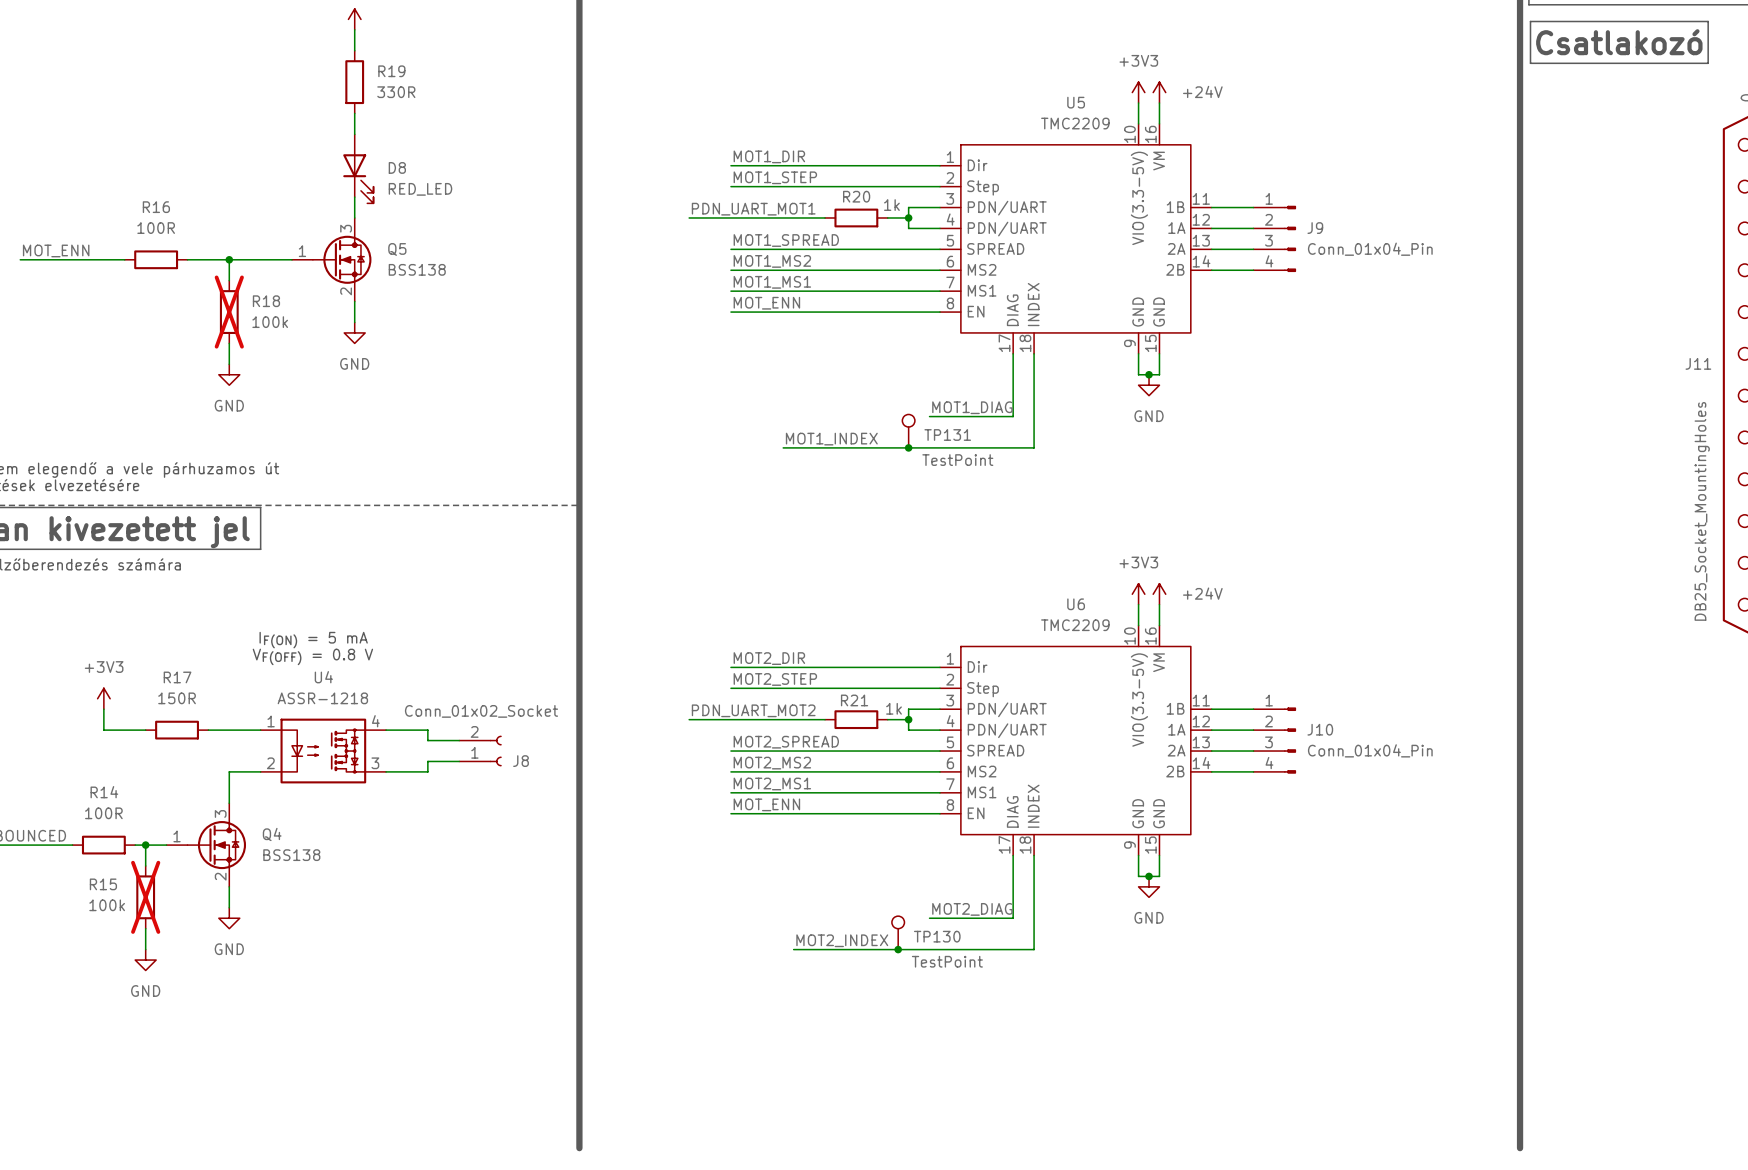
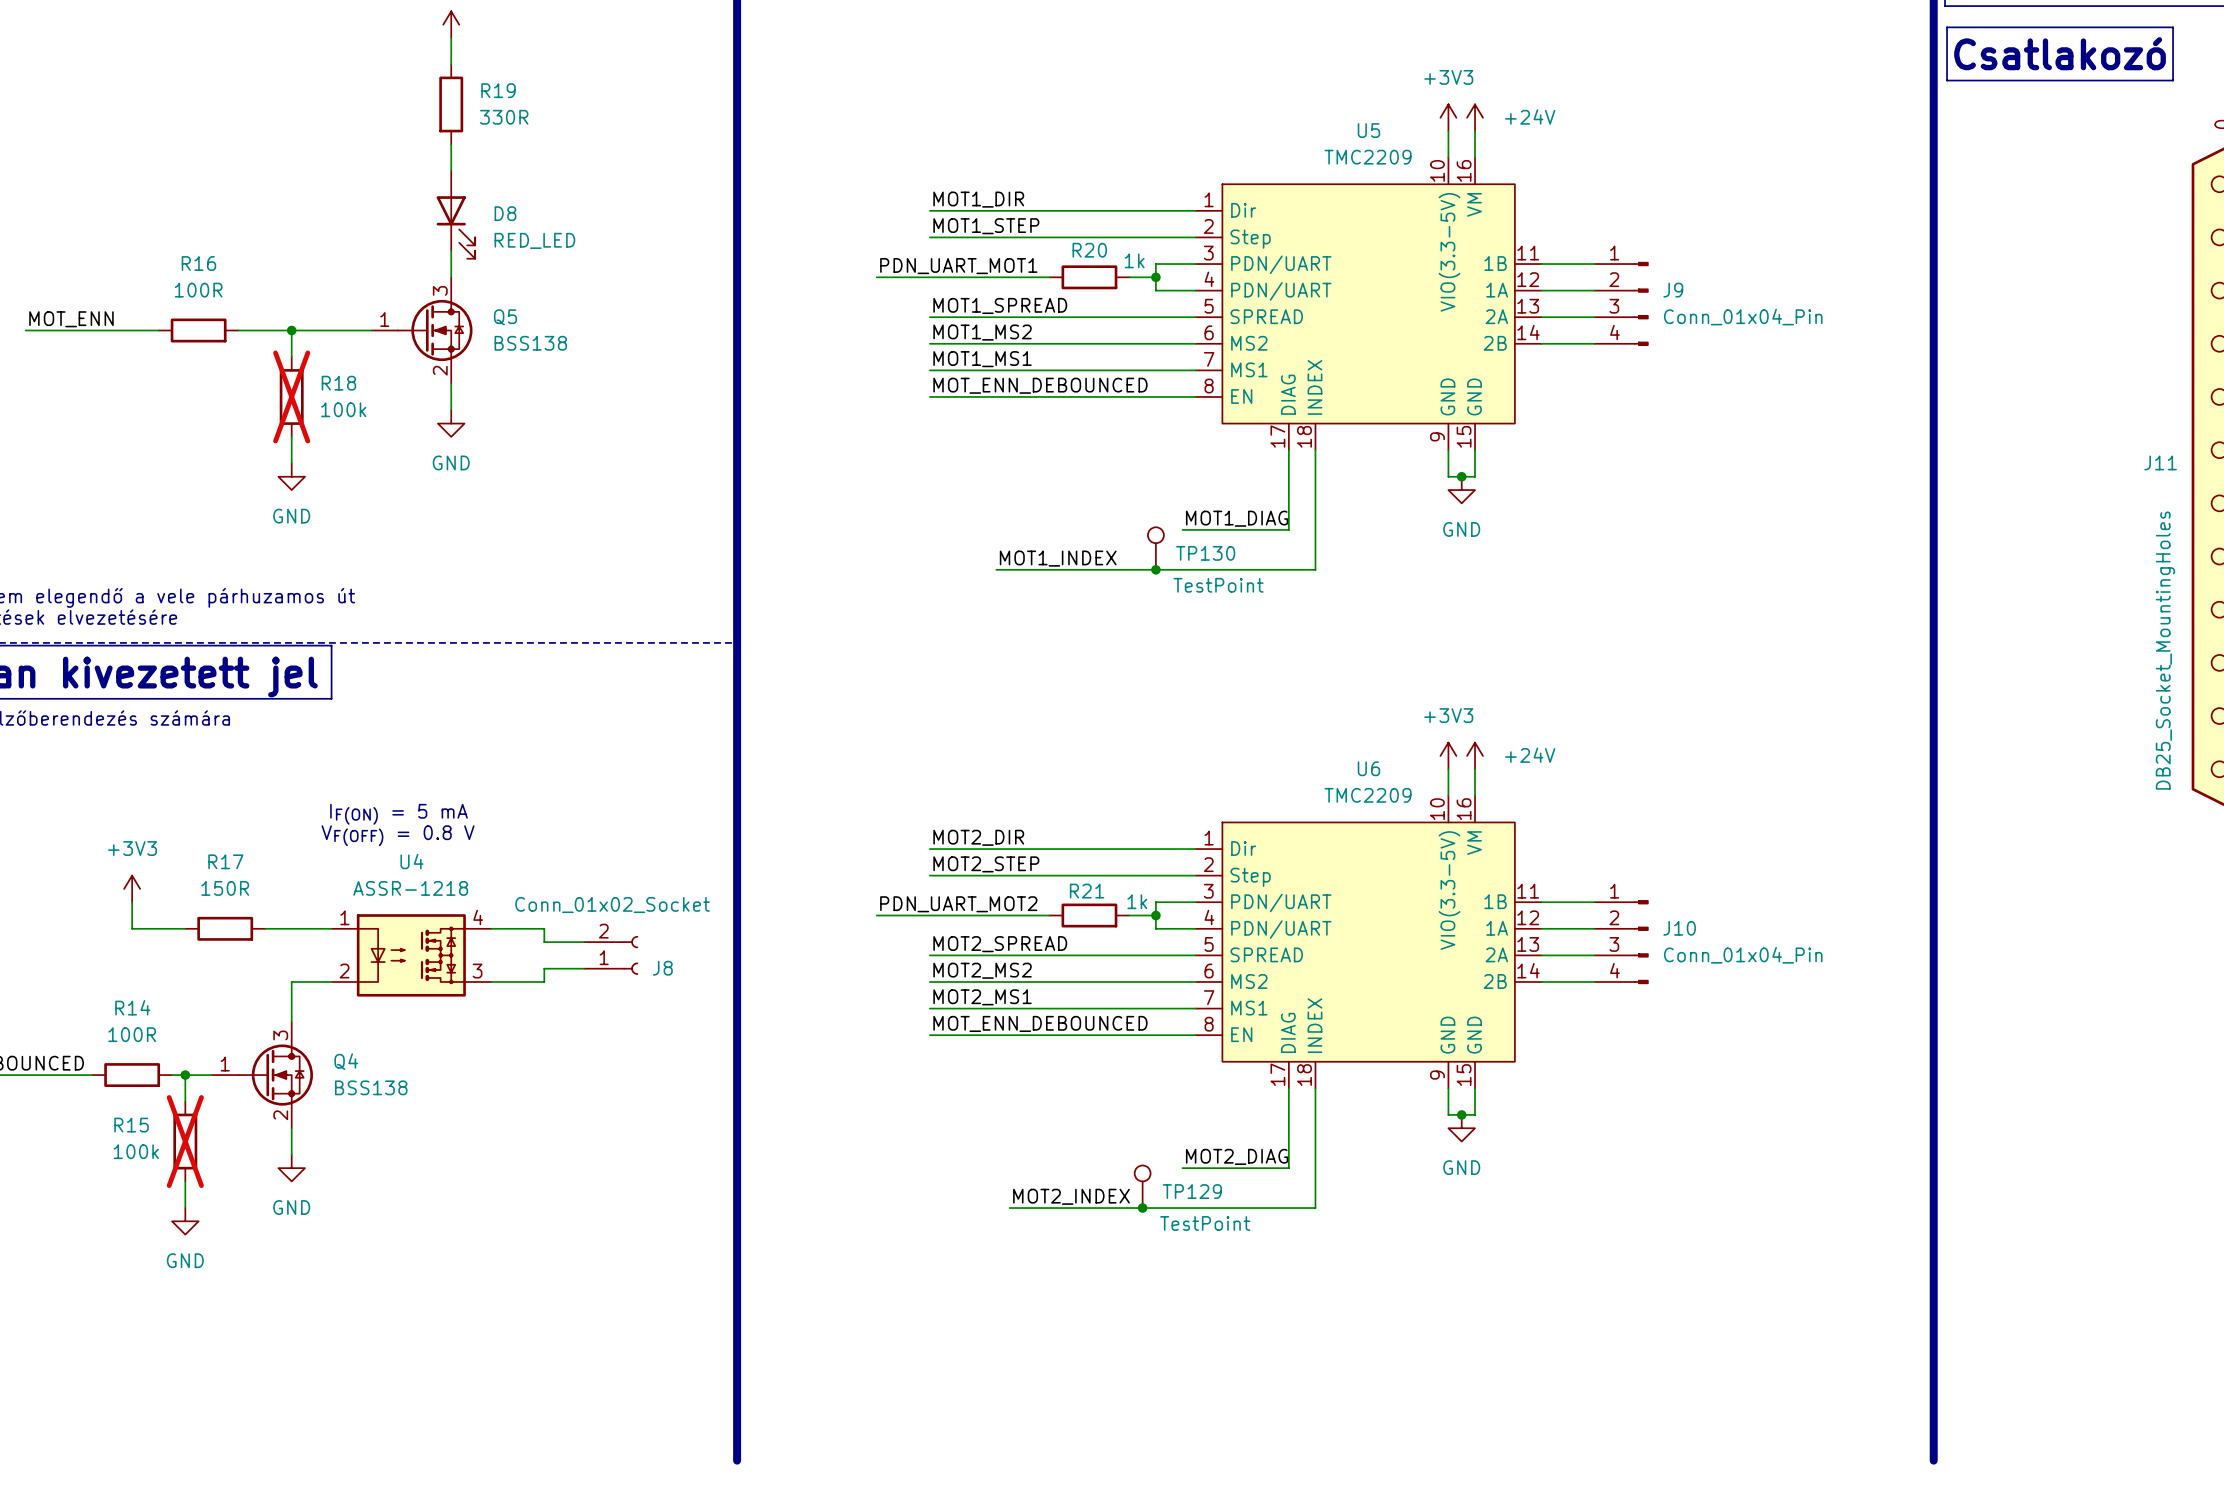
label: MOT_ENN (766, 303) -> MOT_ENN_DEBOUNCED (1040, 385)
TP131 name: TP131 (947, 434) -> TP130 (1205, 553)
label: MOT_ENN (766, 804) -> MOT_ENN_DEBOUNCED (1040, 1023)
TP130 name: TP130 (937, 936) -> TP129 (1192, 1191)

